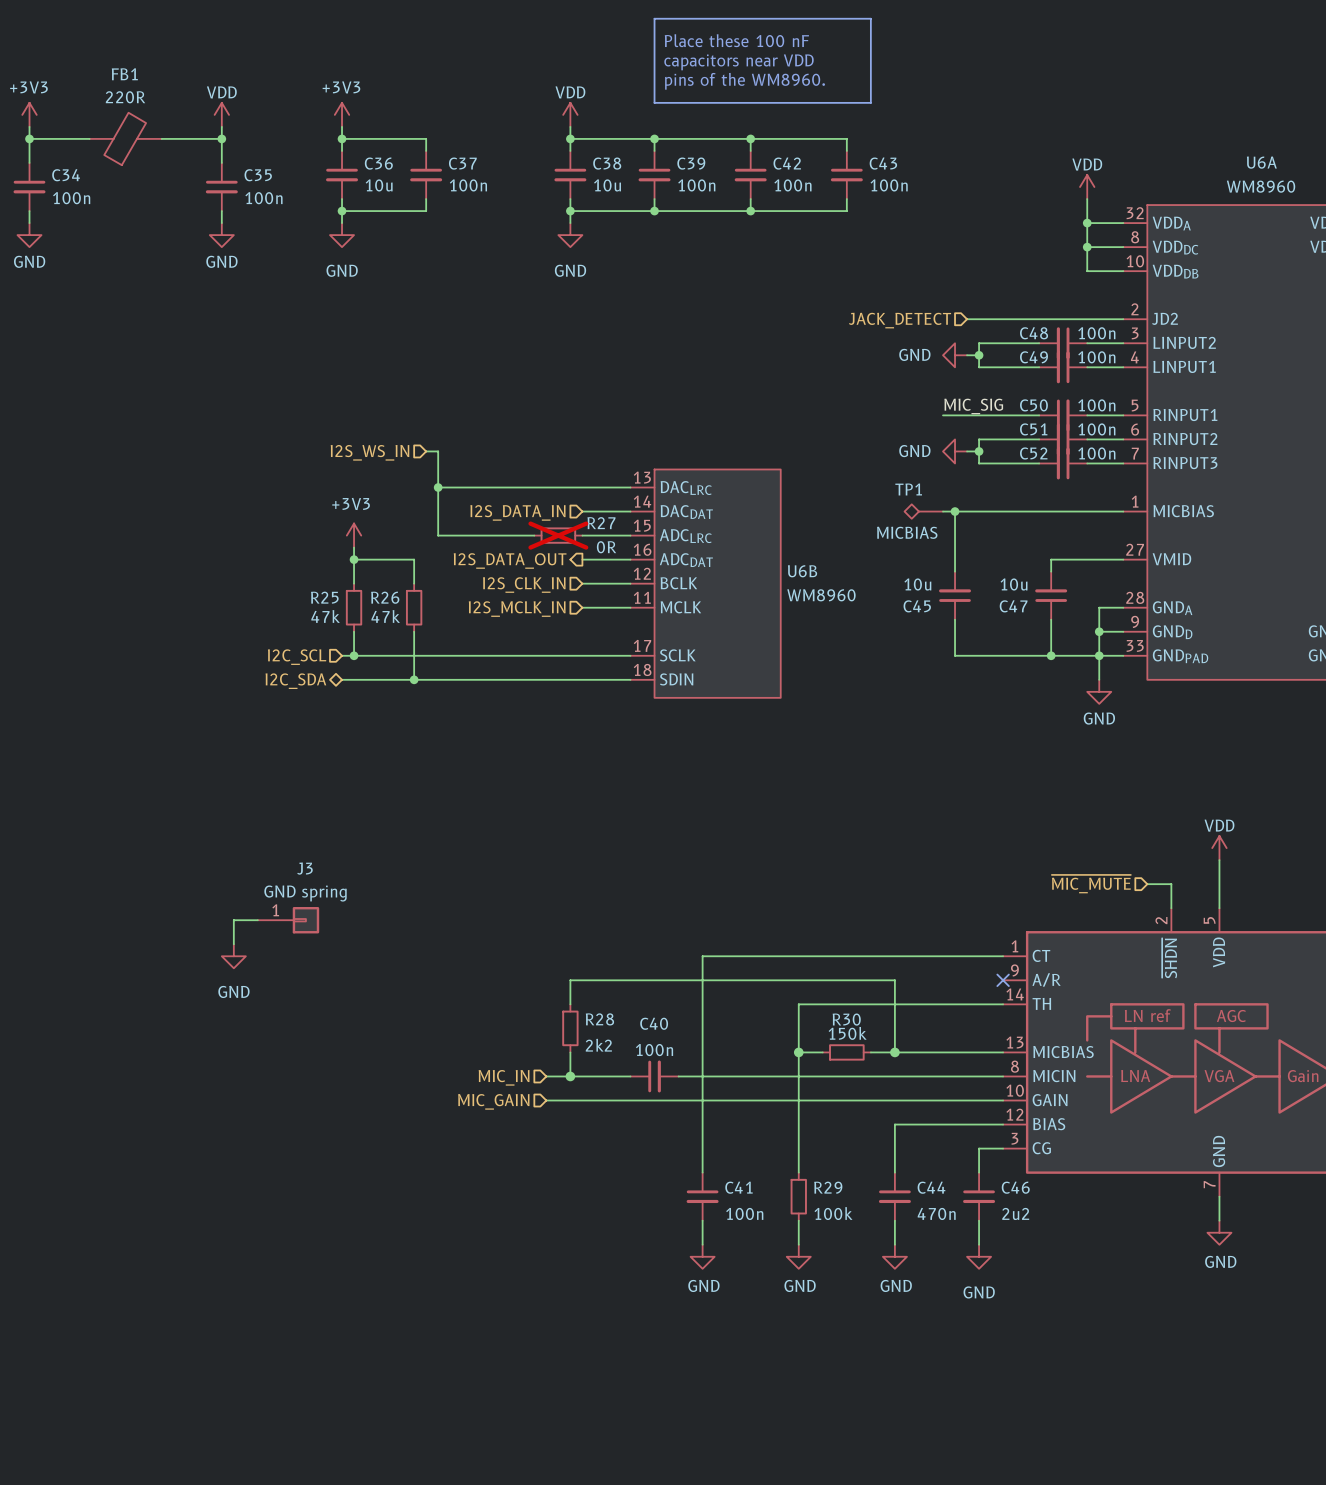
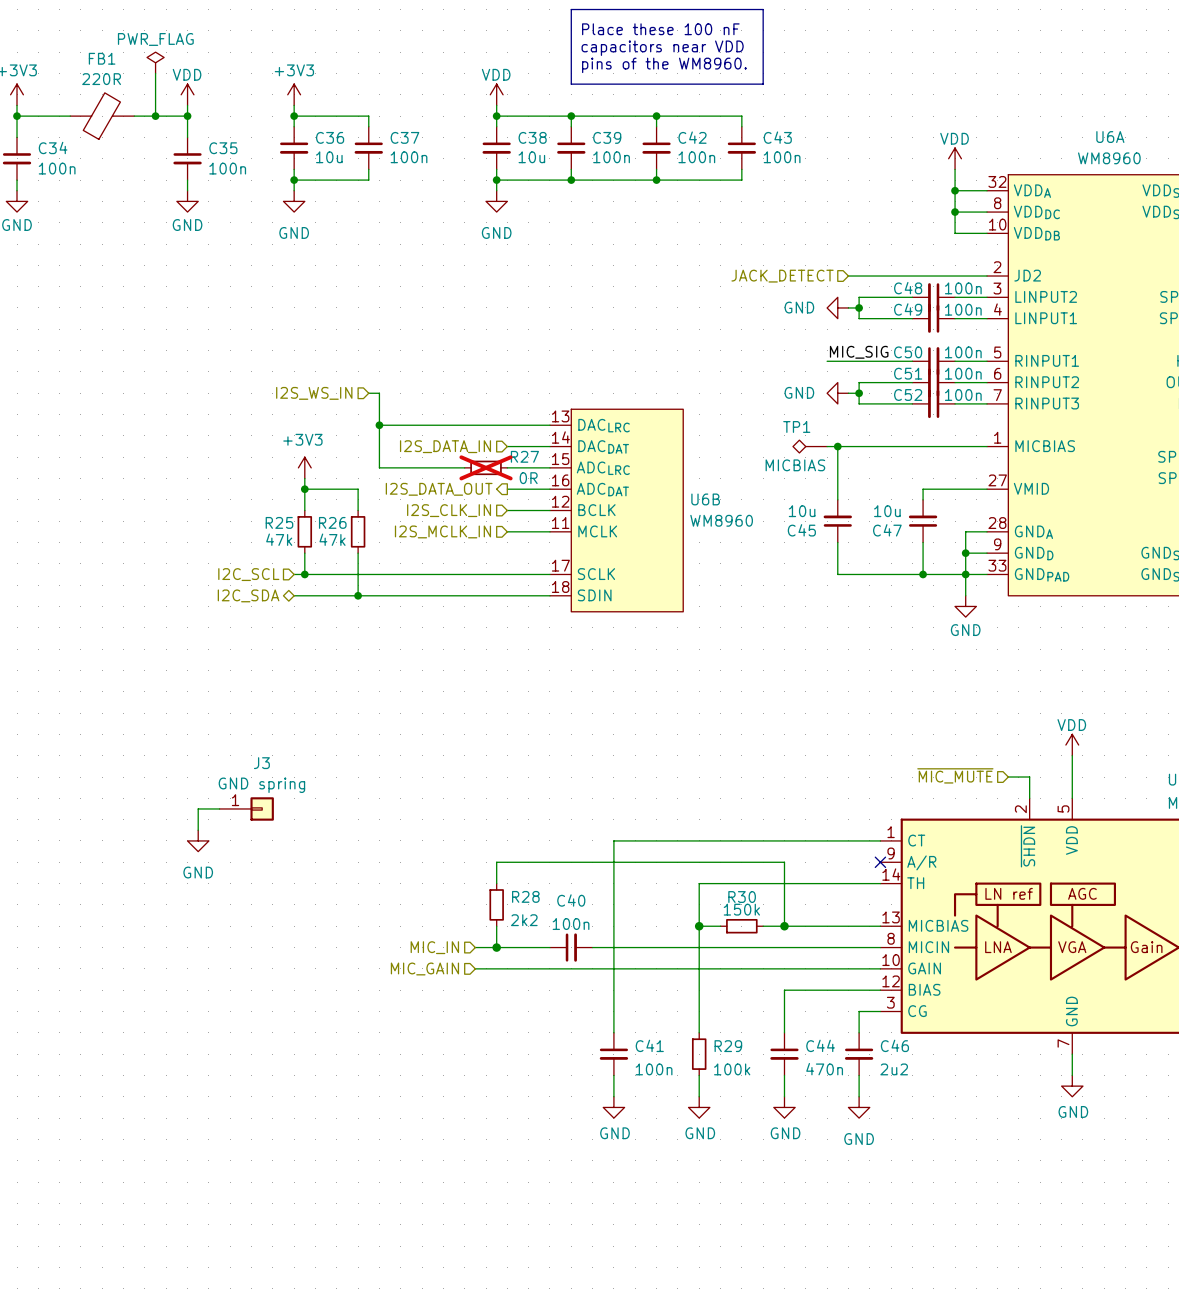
power symbol: none -> PWR_FLAG (155, 62)
wire: none -> (155, 73) (155, 116)
junction: none -> (155, 116)

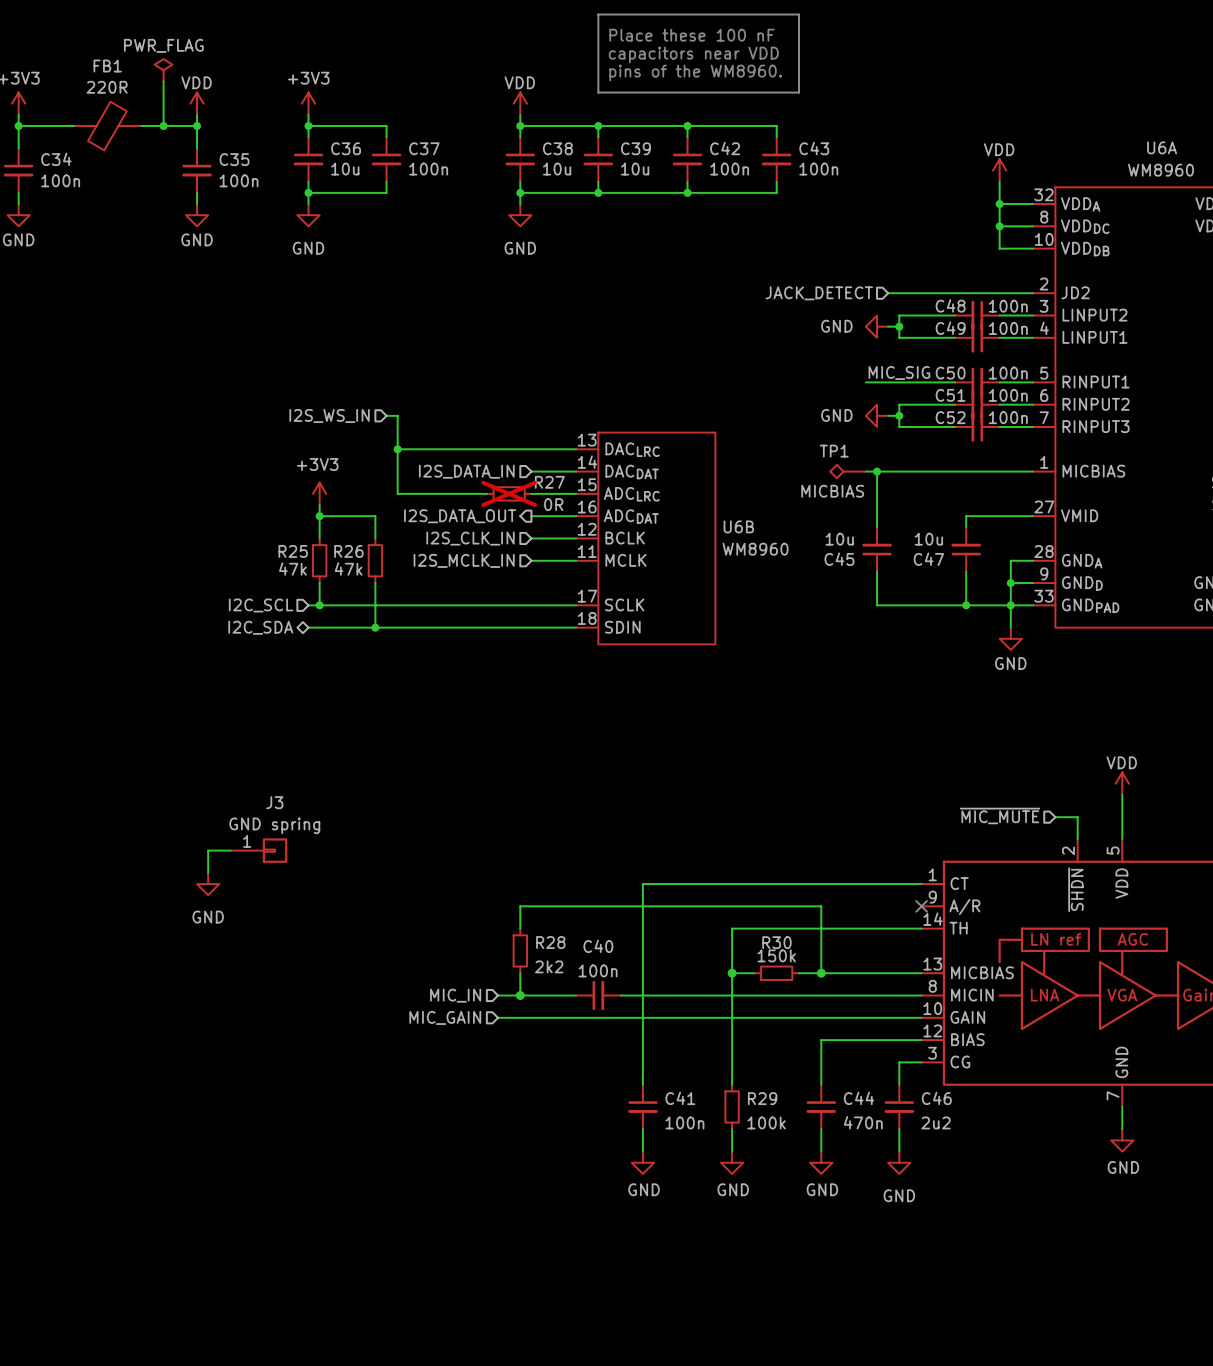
C39 value: 100n (611, 157) -> 10u (635, 169)

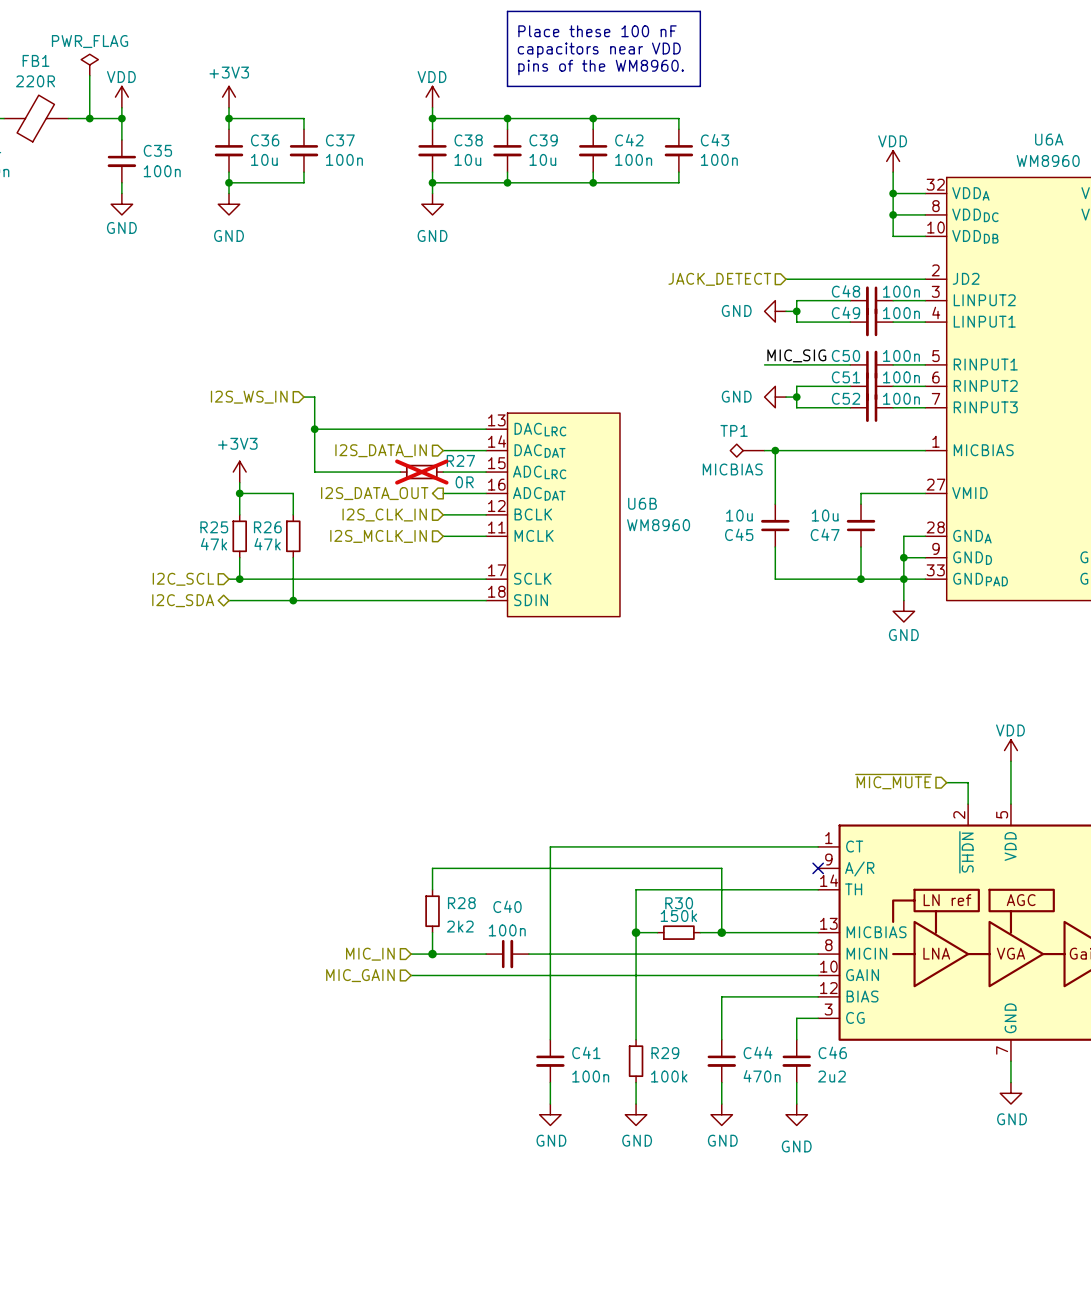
wire: (230, 850) (208, 850) (208, 872) -> none
J3: GND spring (258, 850) -> none
power symbol: GND (208, 884) -> none

